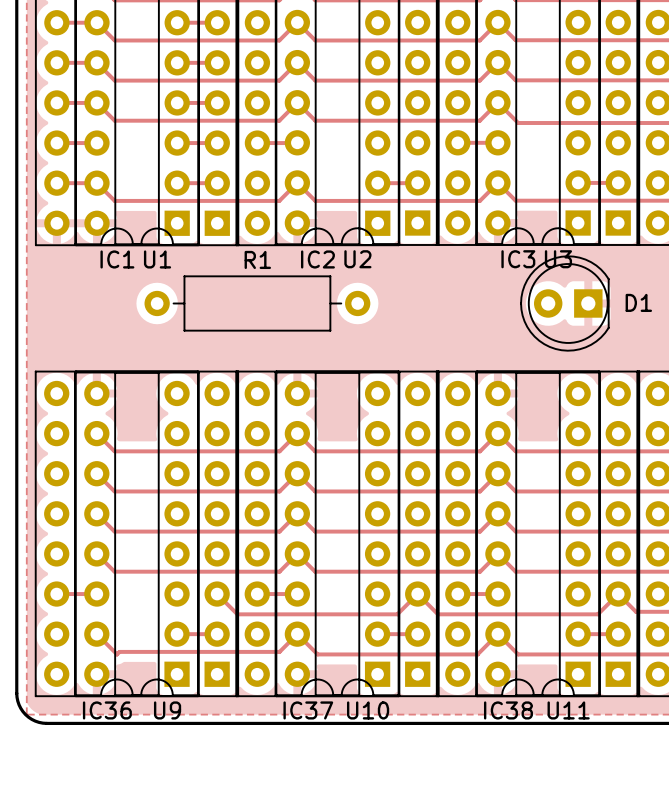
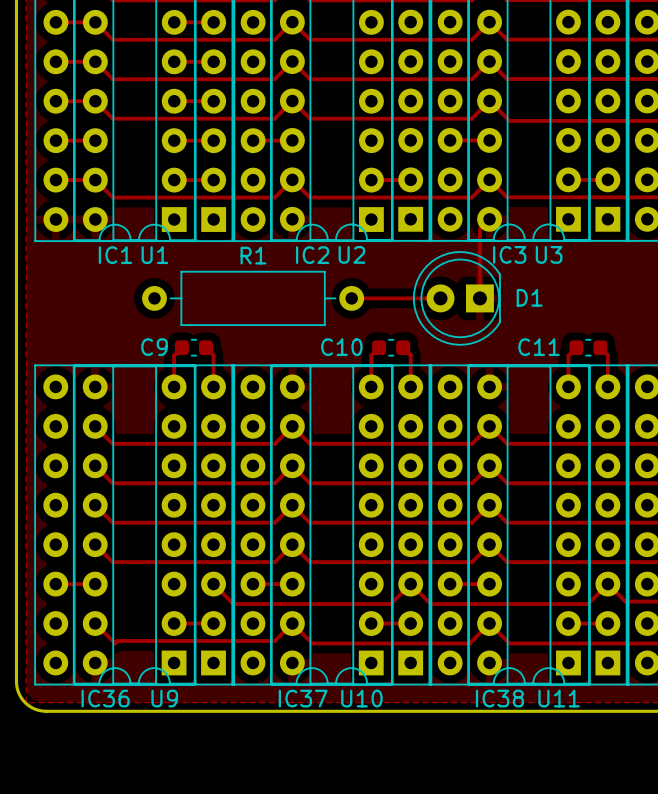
track: none -> (489, 219) (479, 228) (479, 298)
track: none -> (351, 298) (440, 298)
D1 position: (564, 303) -> (456, 298)
track: none -> (181, 347) (174, 355) (174, 386)
C9: none -> (193, 347)
track: none -> (205, 347) (213, 355) (213, 386)
track: none -> (379, 347) (371, 355) (371, 386)
C10: none -> (391, 347)
track: none -> (403, 347) (410, 355) (410, 386)
track: none -> (576, 347) (568, 355) (568, 386)
C11: none -> (588, 347)
track: none -> (600, 347) (607, 355) (607, 386)

